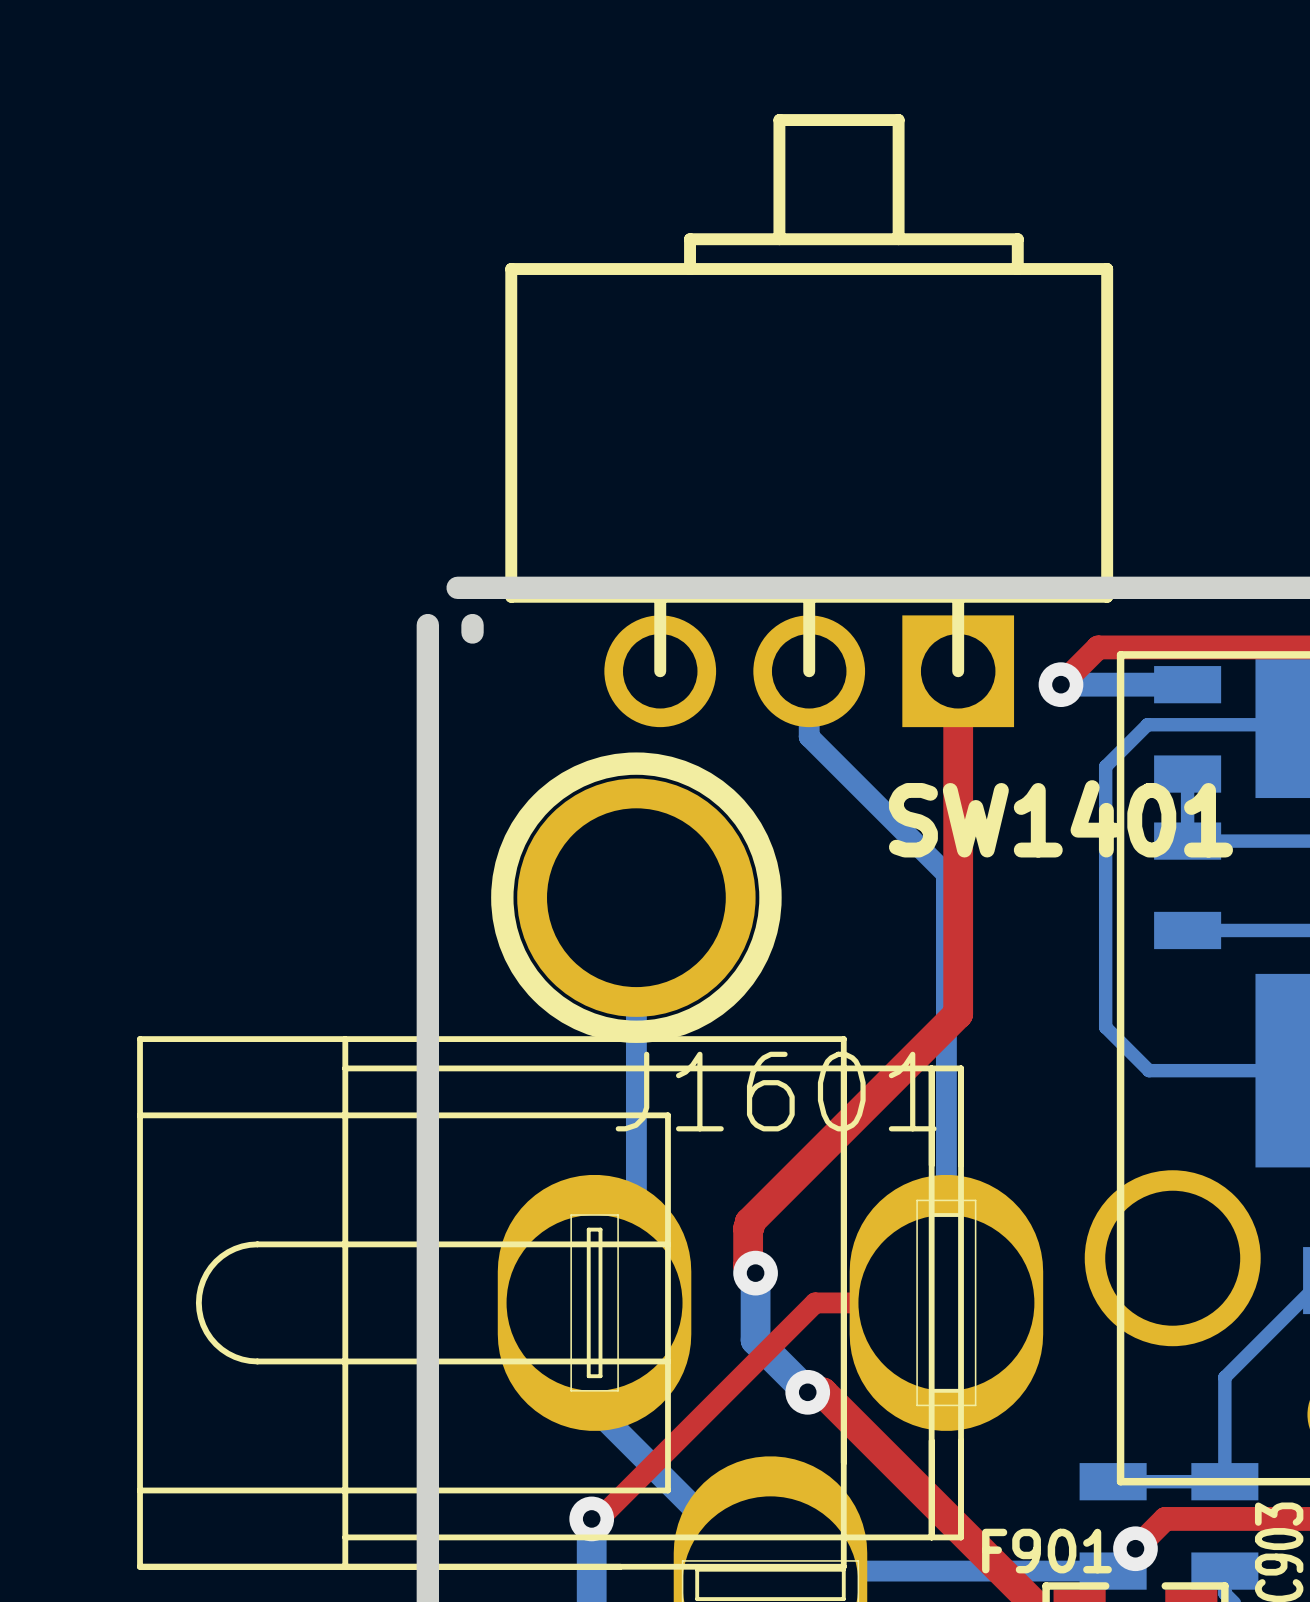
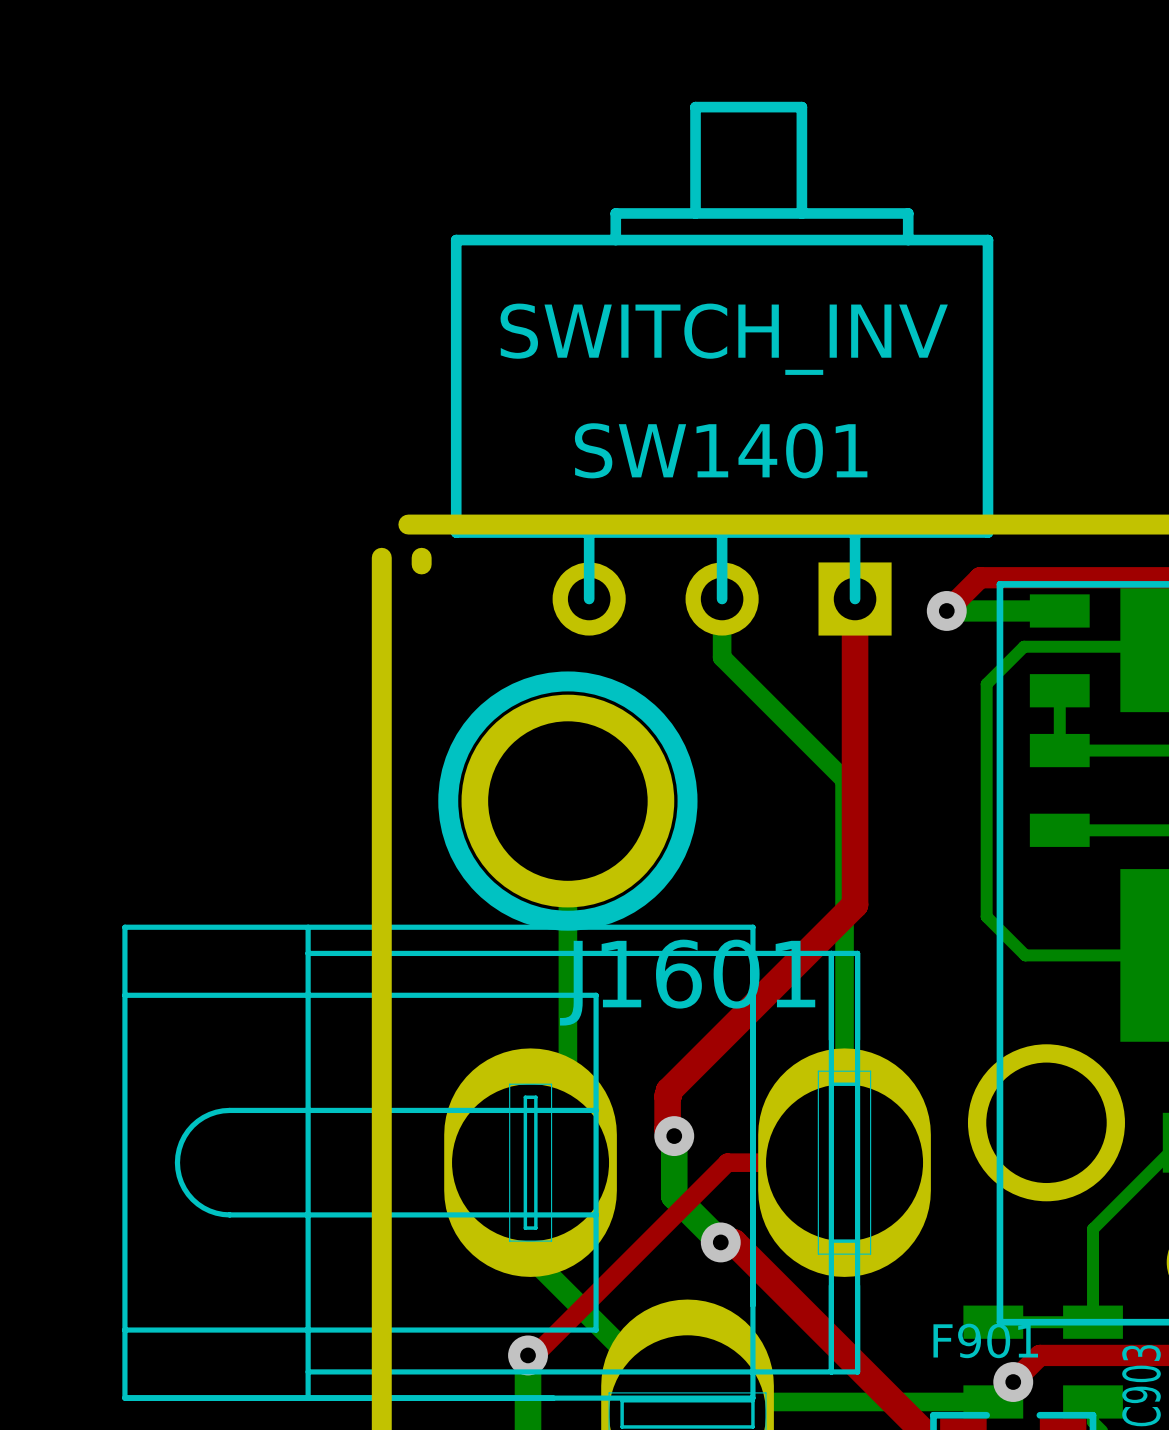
SW1401 footprint: [505, 114, 1114, 728] -> [450, 101, 994, 636]
SW1401 value: none -> SWITCH_INV (724, 339)
SW1401 name position: SW1401 (1060, 818) -> SW1401 (721, 450)
F901 name position: F901 (1046, 1551) -> F901 (985, 1340)

